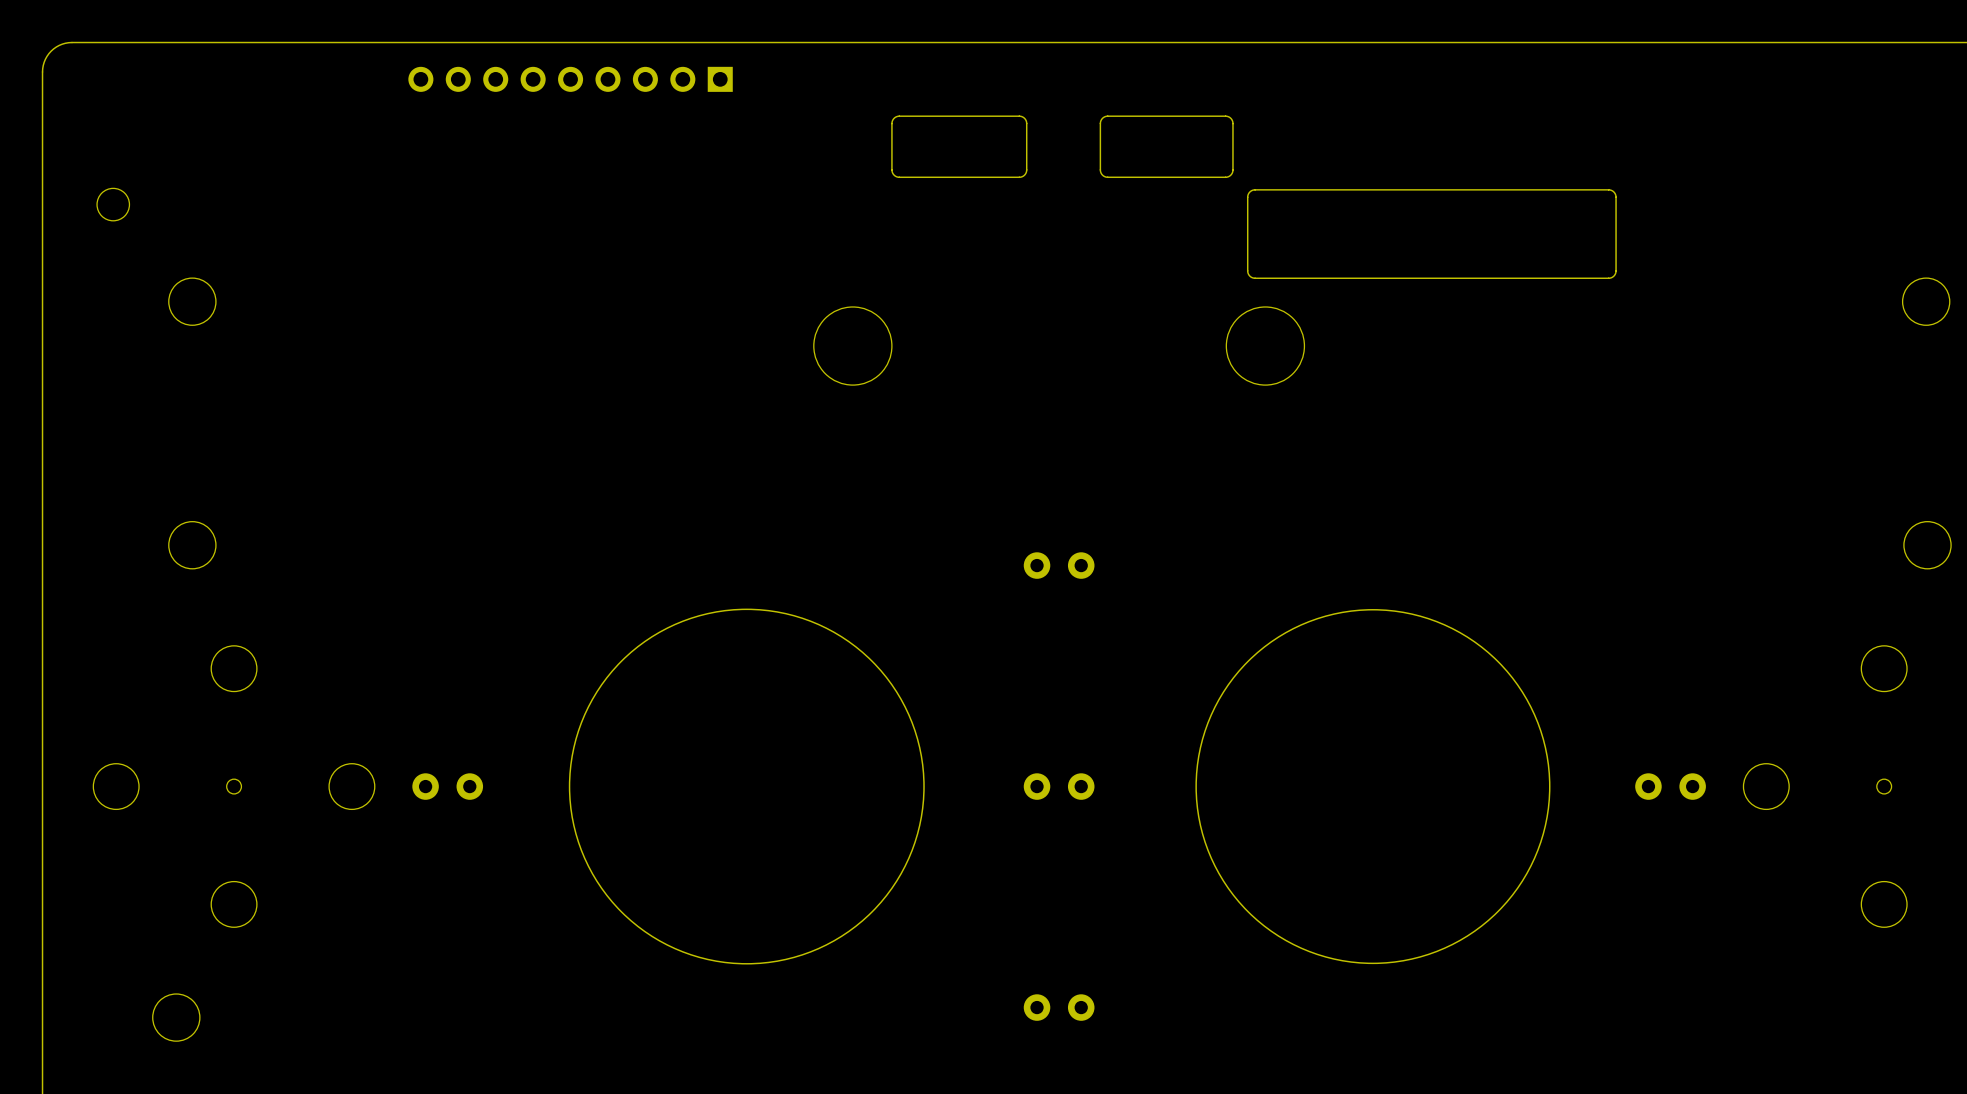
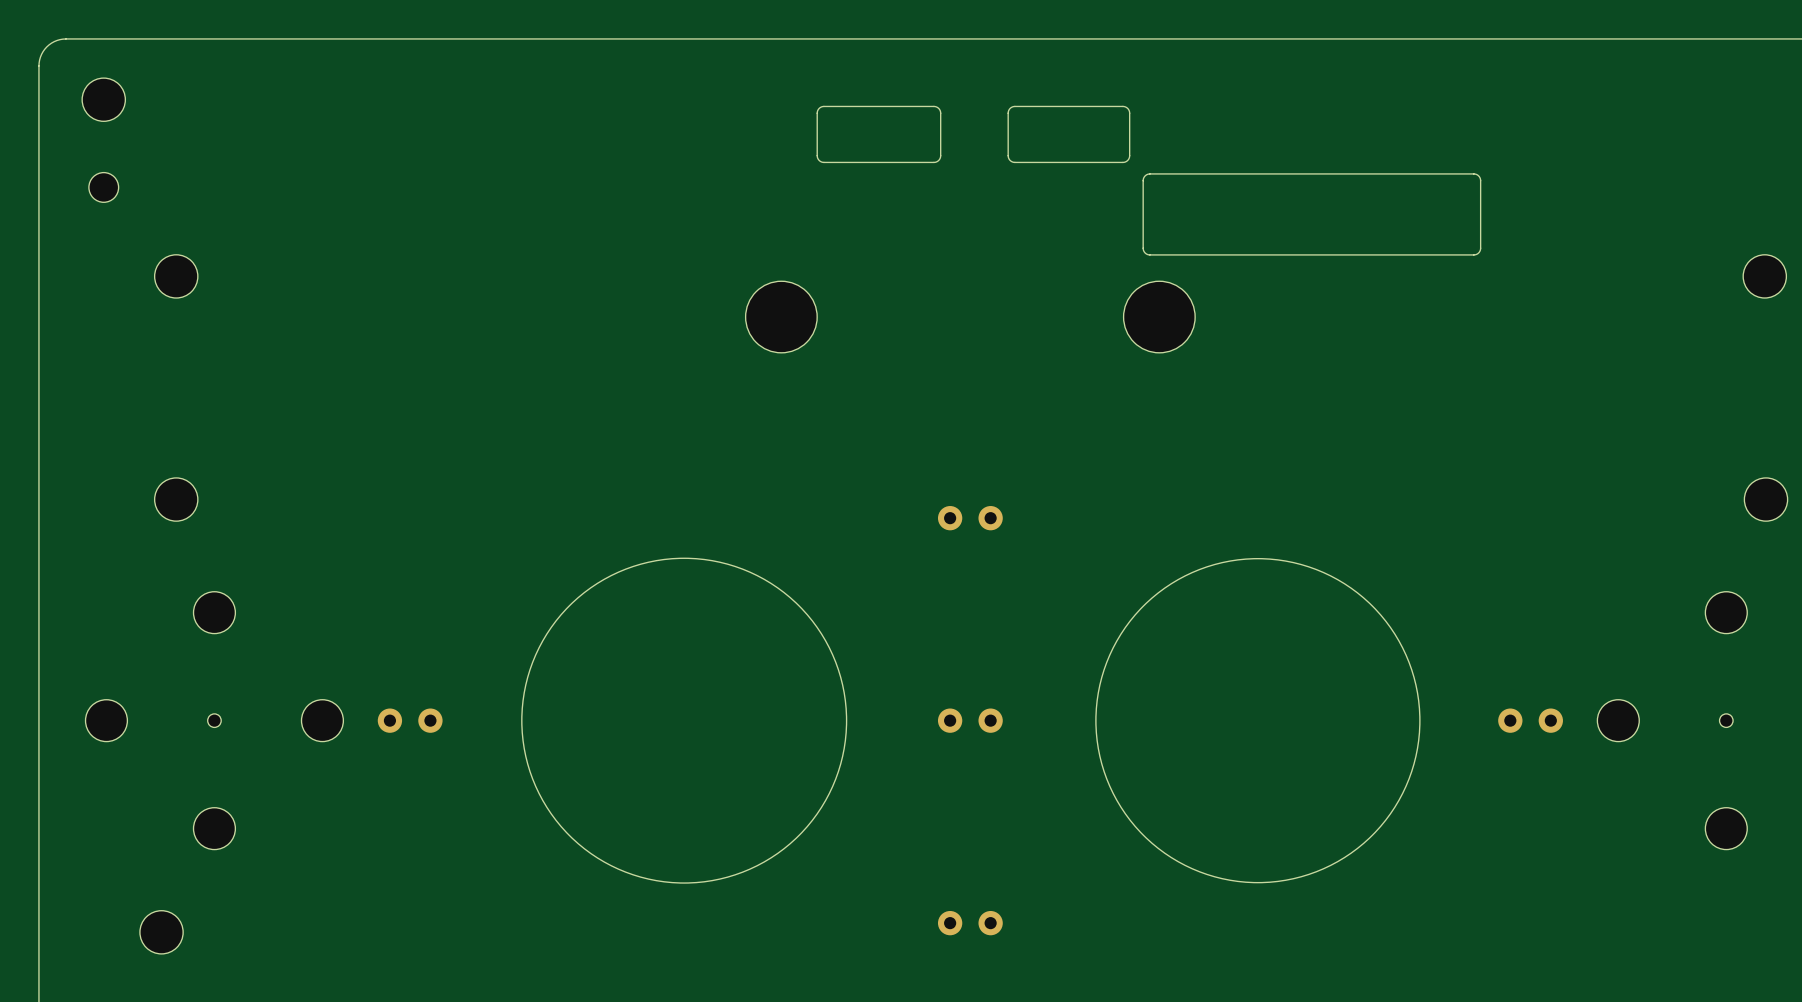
part: (570, 79) -> none
part: none -> (103, 99)

